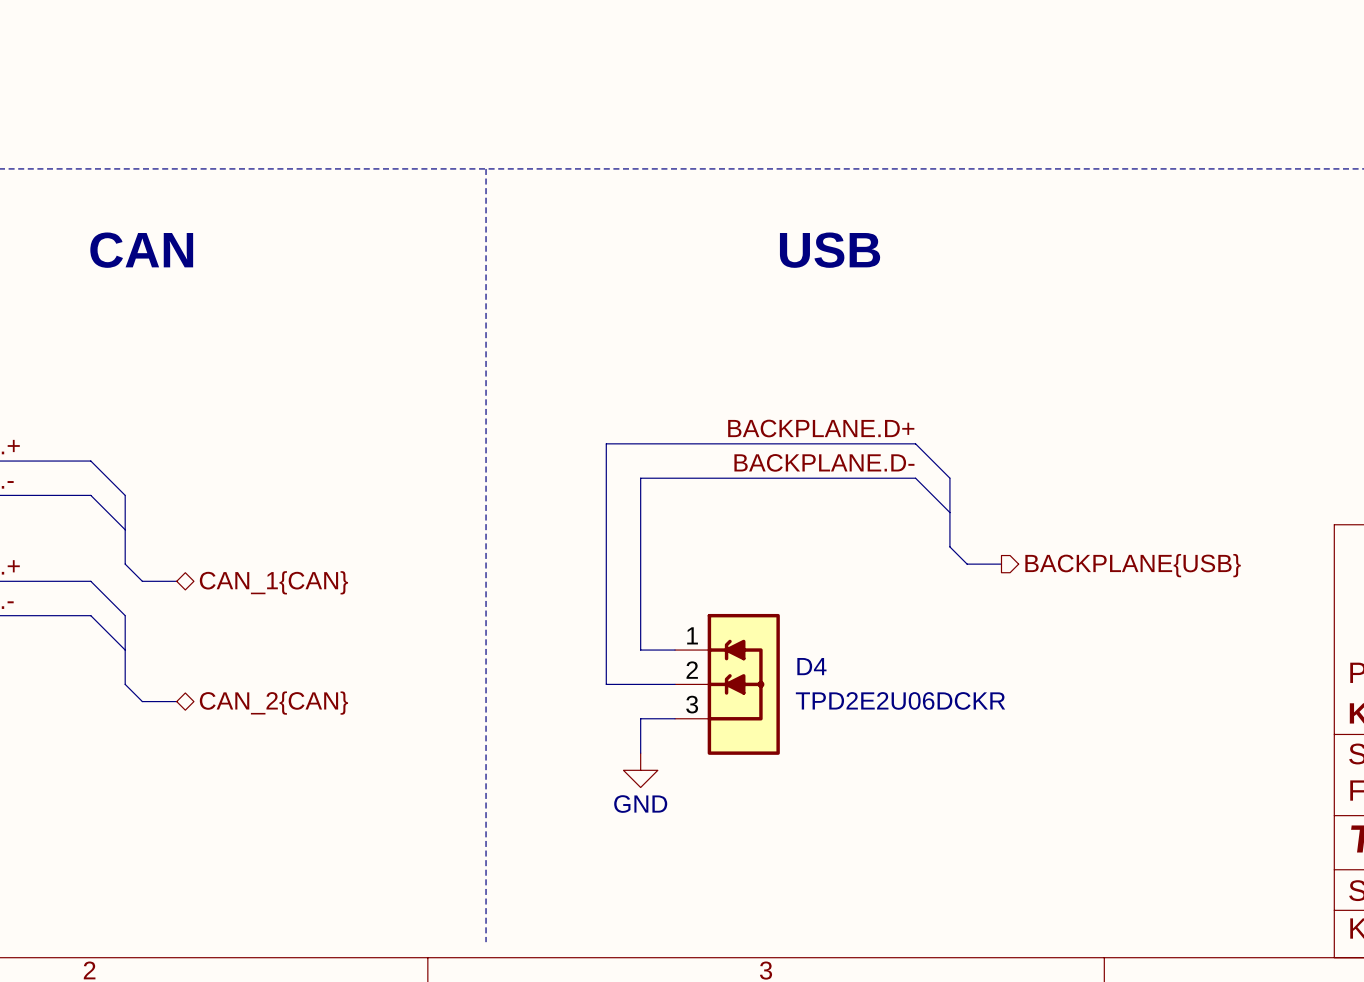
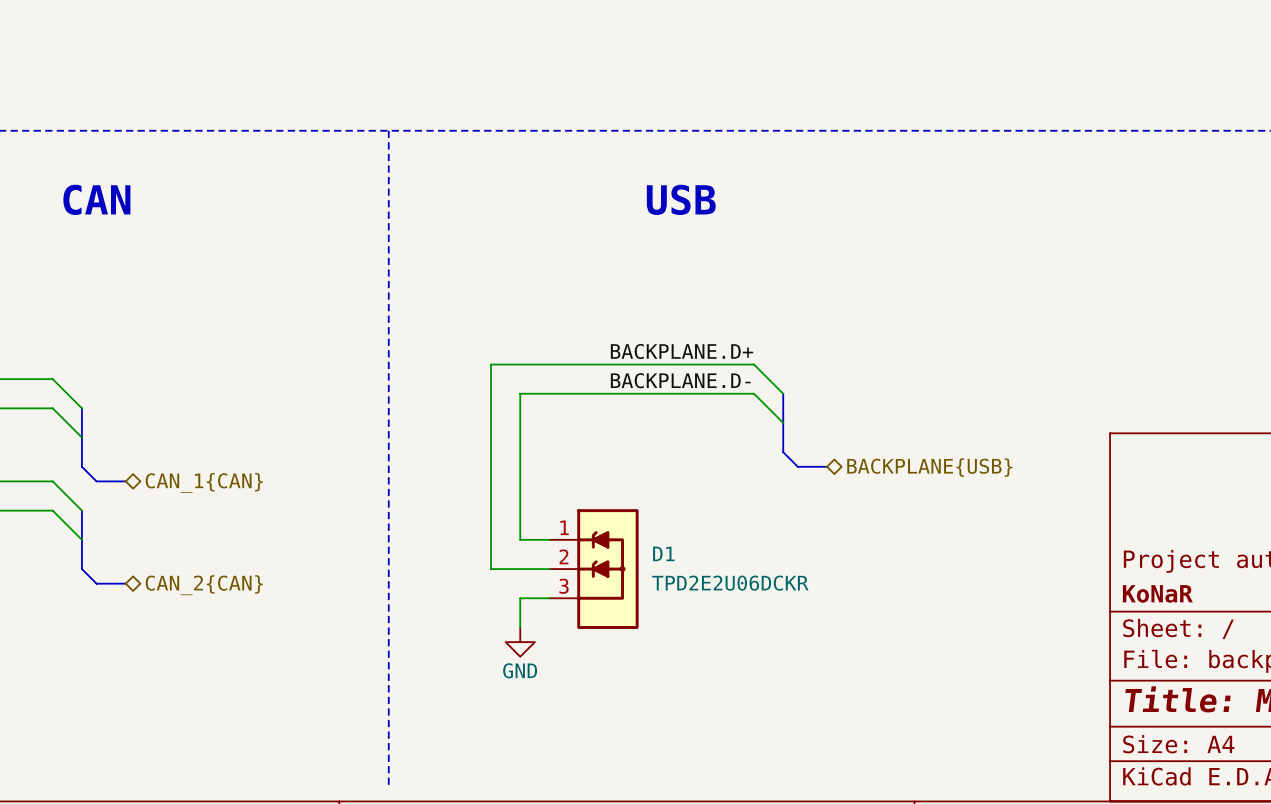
hierarchical label shape: output (1133, 565) -> bidirectional (929, 467)
D4 name: D4 (811, 666) -> D1 (663, 553)

